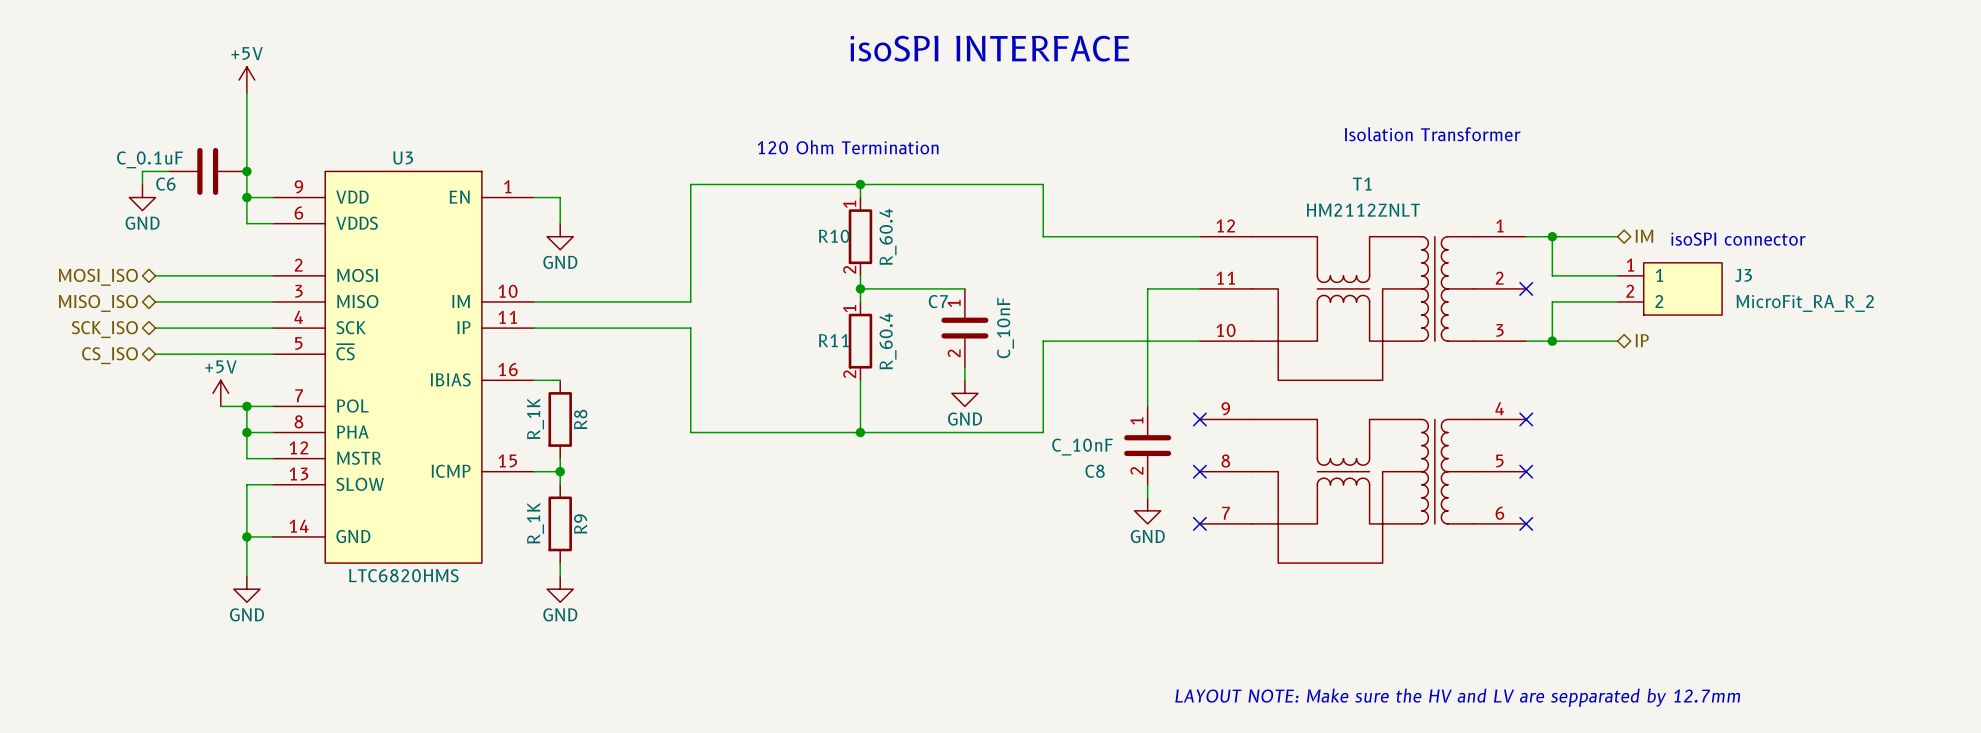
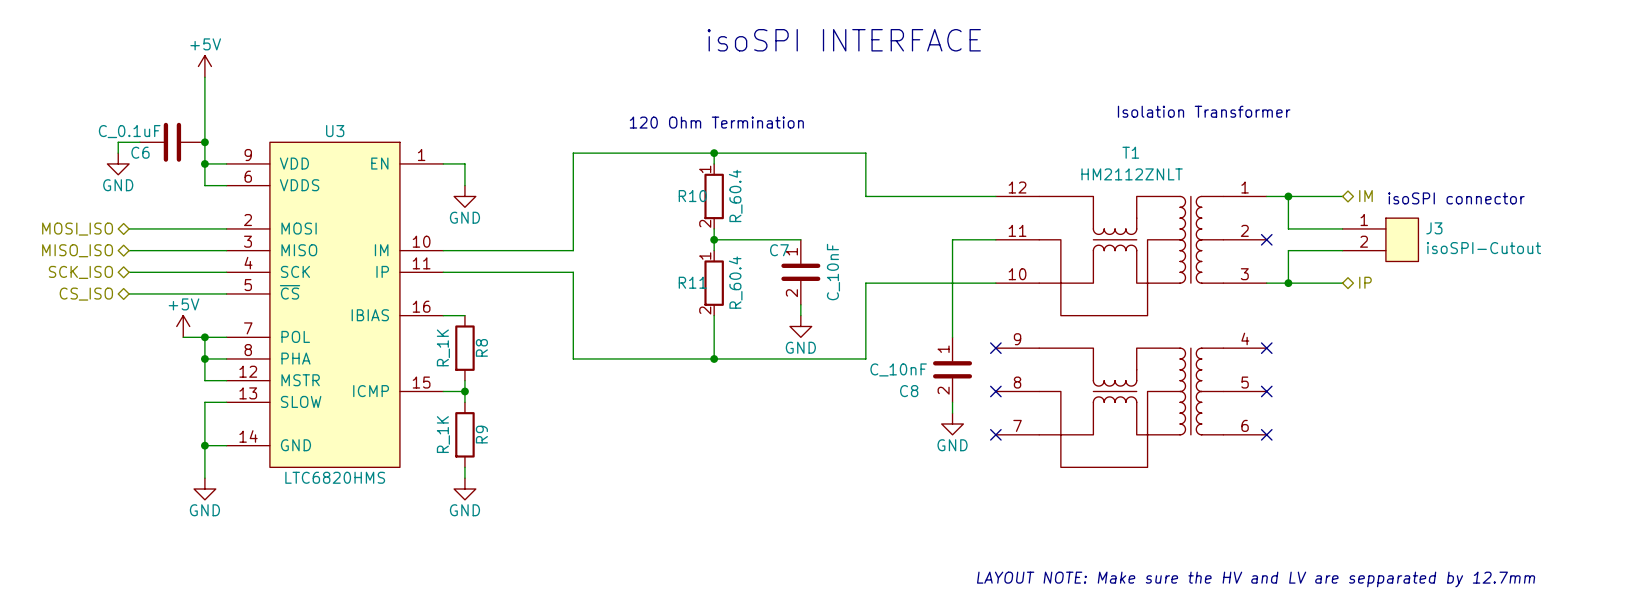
J3 symbol: [1617, 262, 1723, 316] -> [1342, 218, 1419, 262]
J3 value: MicroFit_RA_R_2 (1805, 303) -> isoSPI-Cutout (1483, 248)

